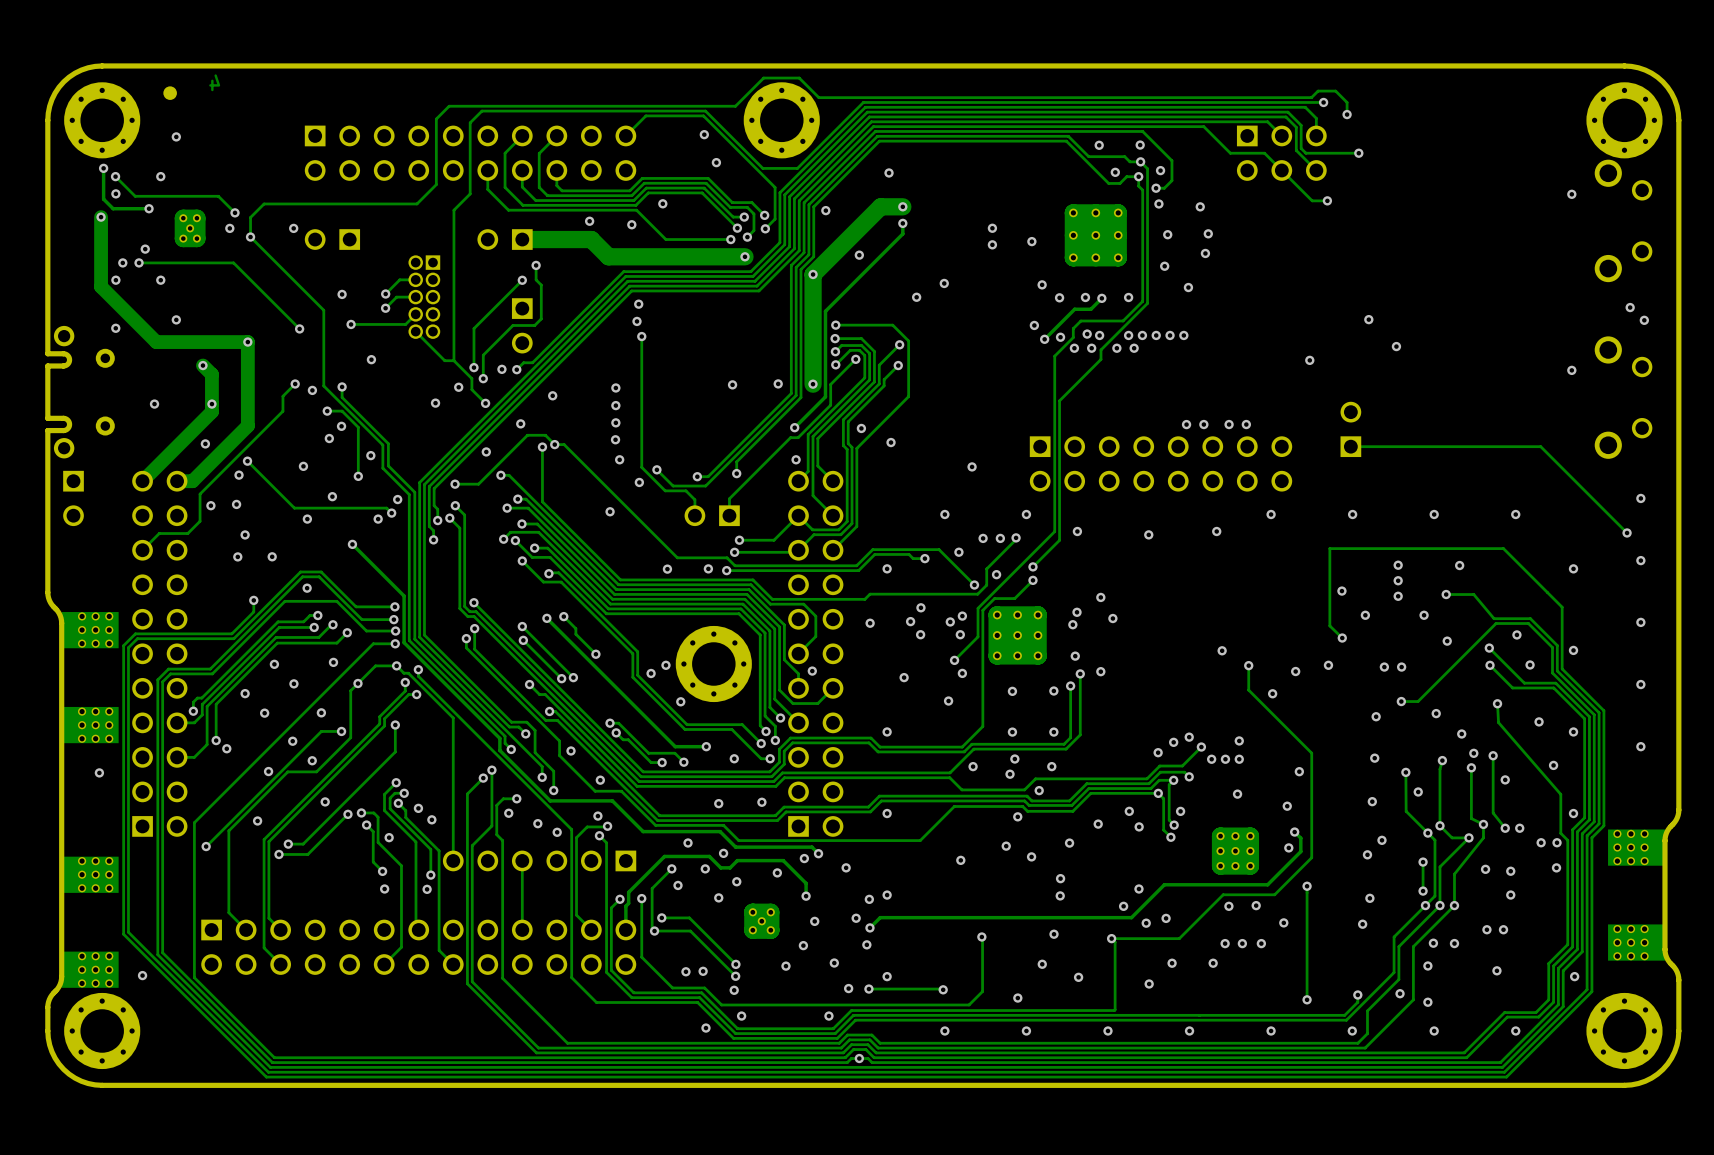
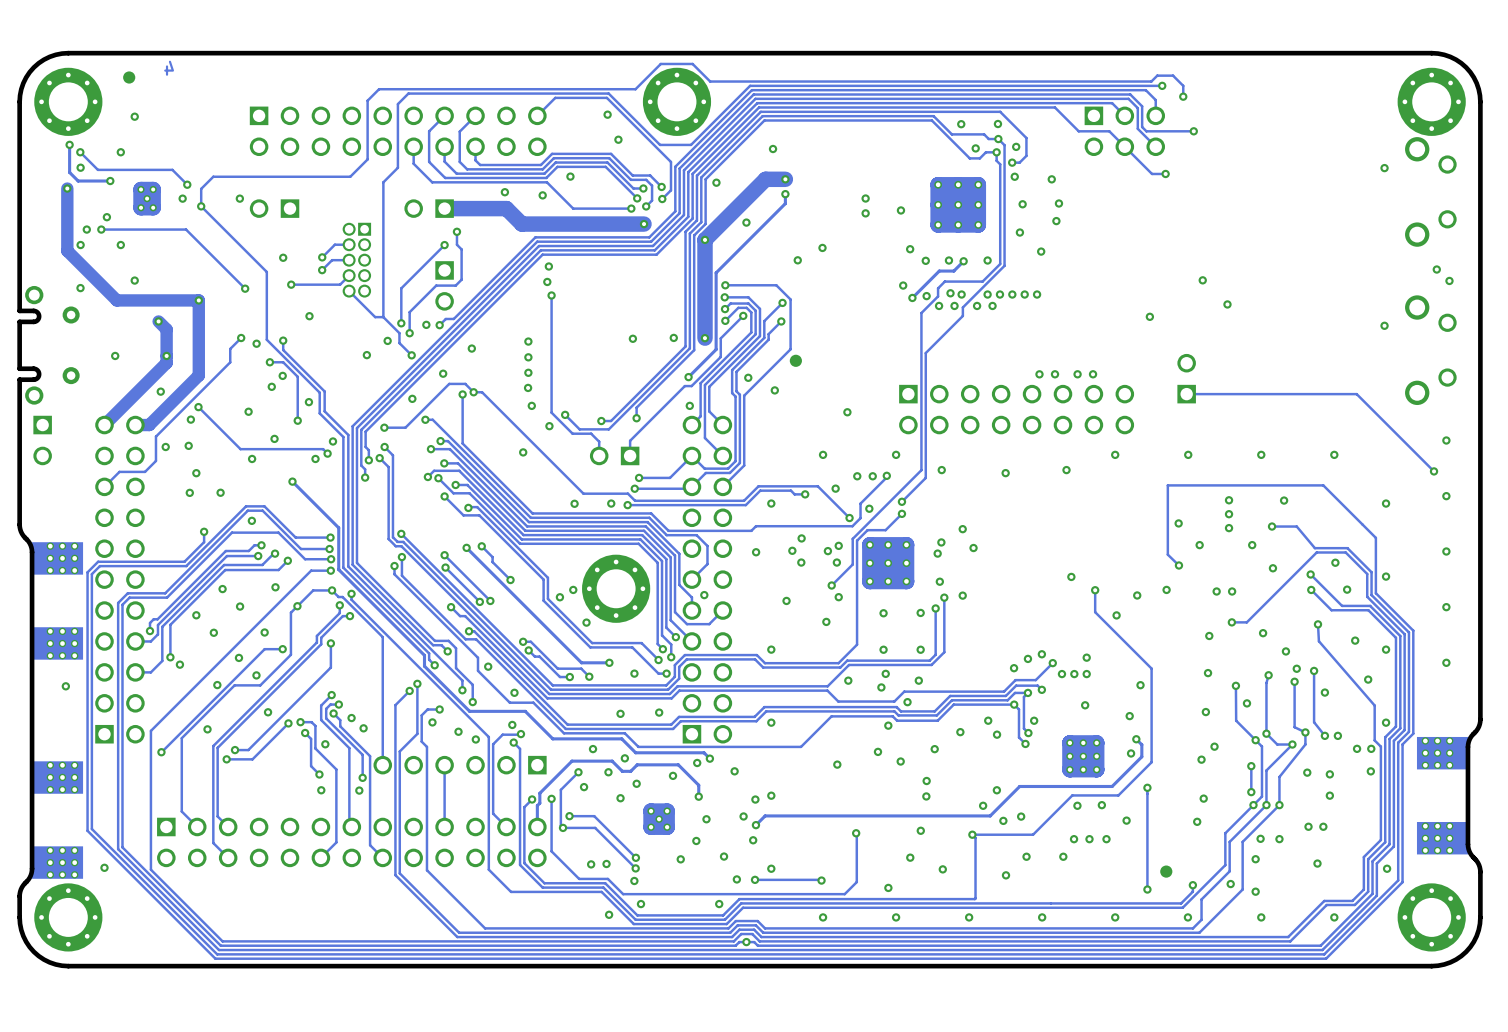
part: none -> (795, 360)
part: none -> (1166, 871)

